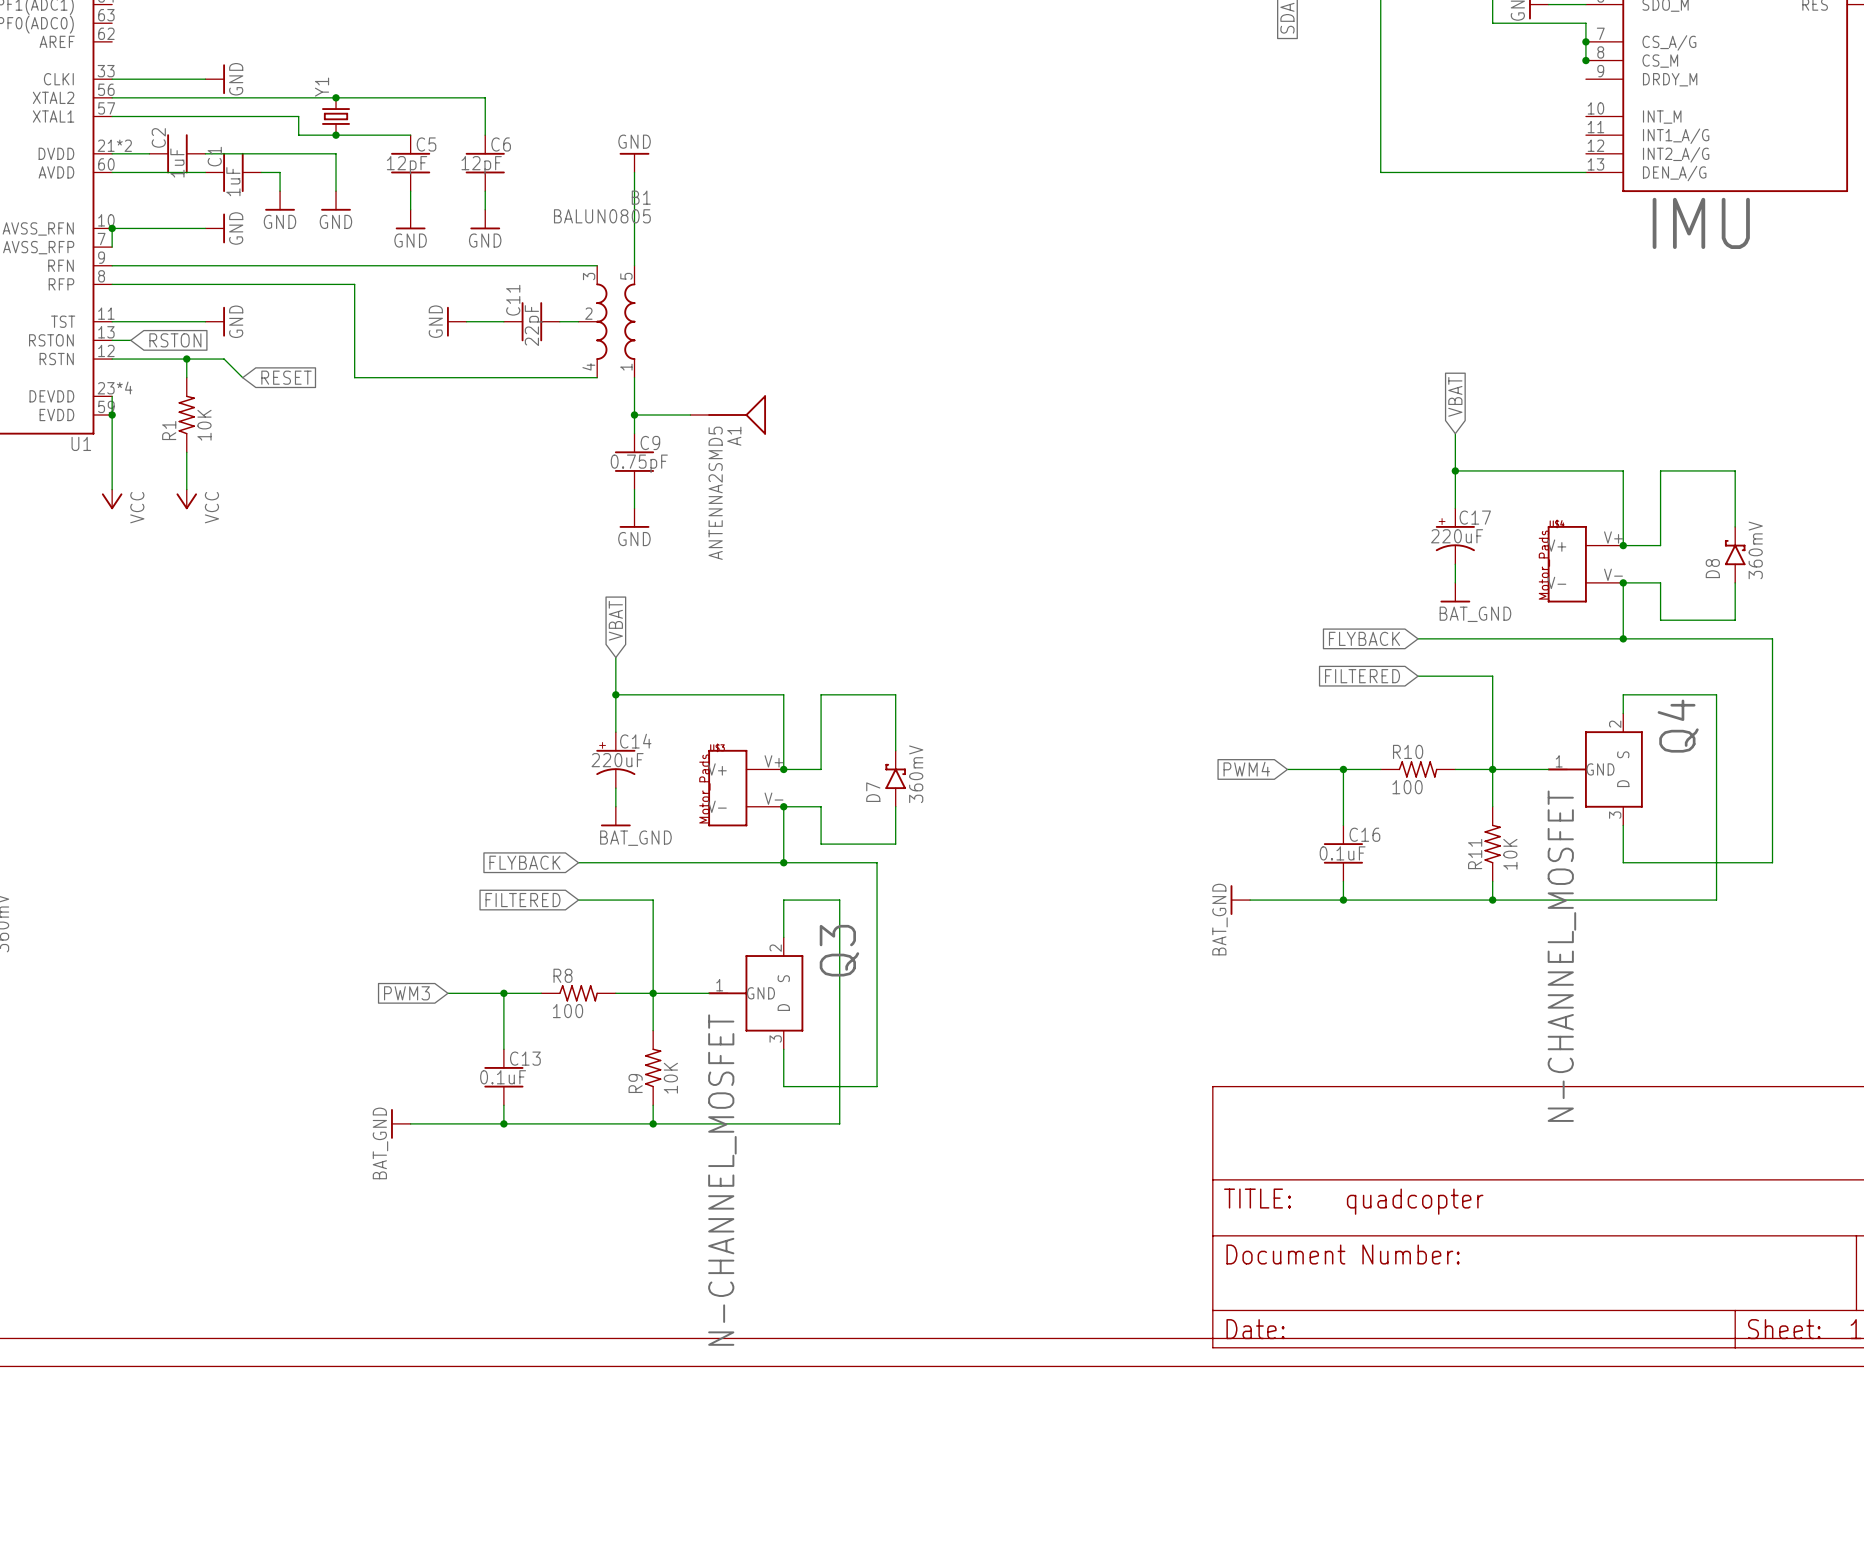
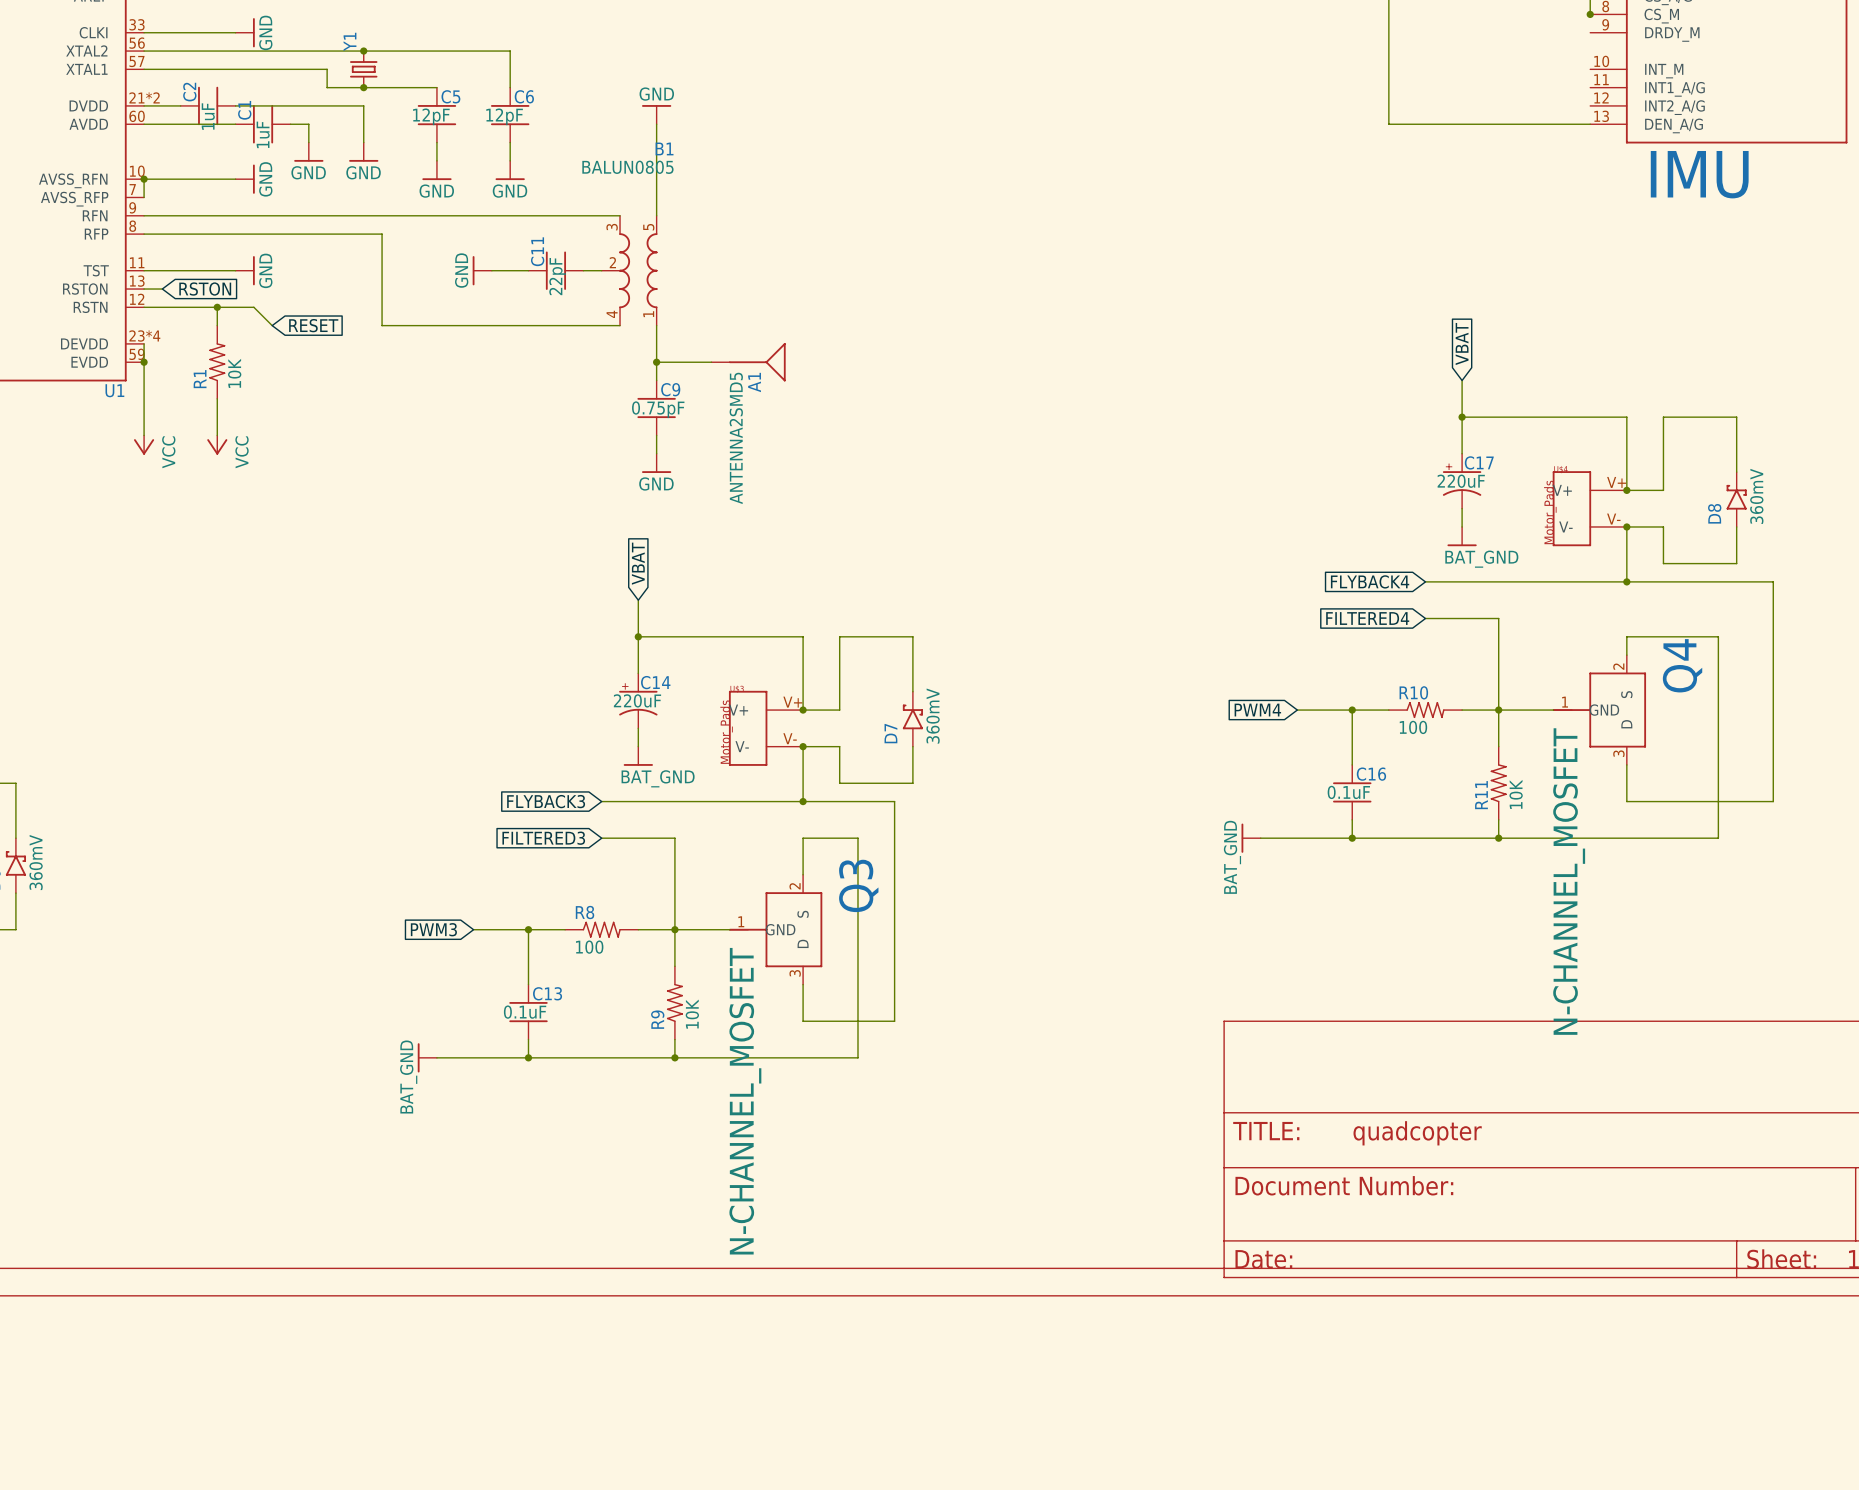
global label: FLYBACK (1364, 638) -> FLYBACK4 (1370, 581)
global label: FILTERED (1362, 676) -> FILTERED4 (1367, 618)
global label: FLYBACK (524, 862) -> FLYBACK3 (546, 801)
global label: FILTERED (523, 900) -> FILTERED3 (543, 838)

